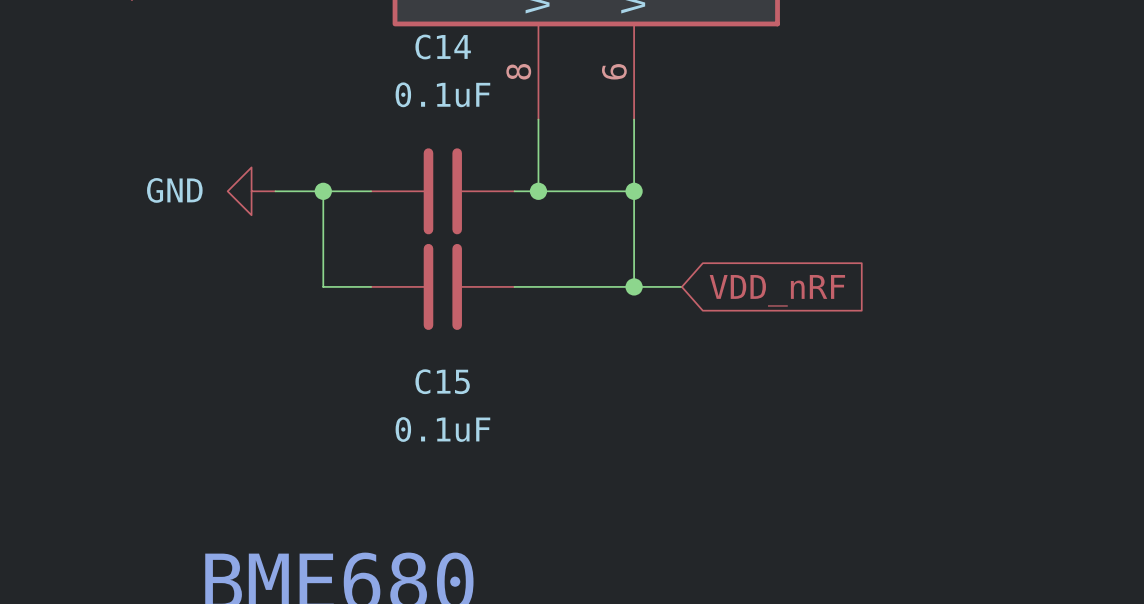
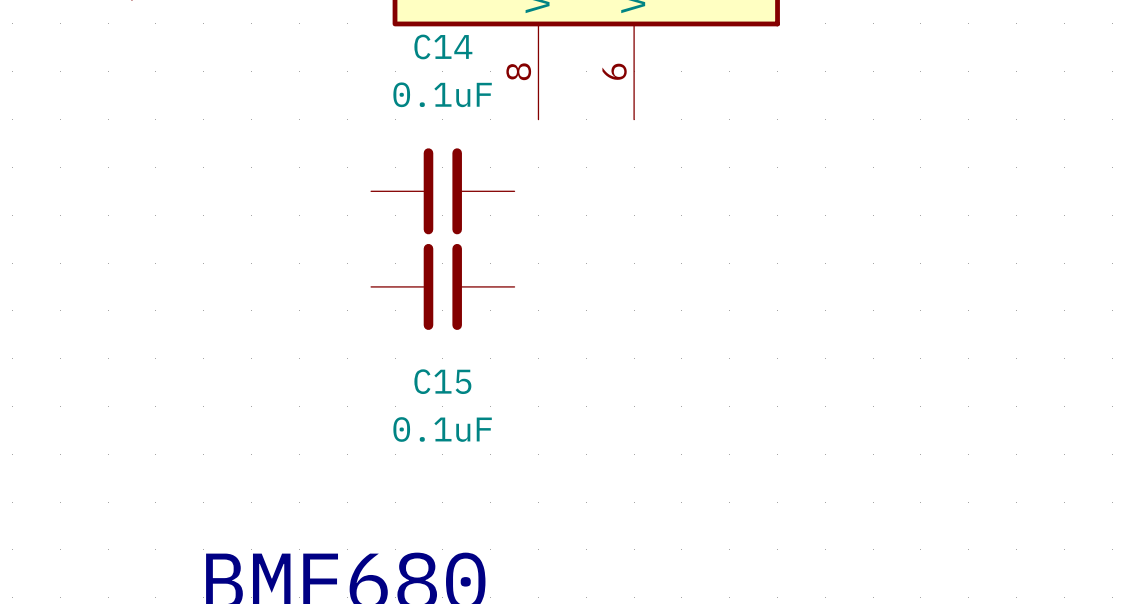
wire: (538, 119) (538, 191) -> none
wire: (634, 119) (634, 286) -> none
power symbol: GND (251, 191) -> none
wire: (275, 191) (371, 191) -> none
wire: (323, 191) (323, 286) (371, 286) -> none
junction: (323, 191) -> none
wire: (514, 191) (634, 191) -> none
junction: (538, 191) -> none
junction: (634, 191) -> none
wire: (514, 286) (681, 286) -> none
junction: (634, 286) -> none
global label: VDD_nRF (777, 290) -> none

